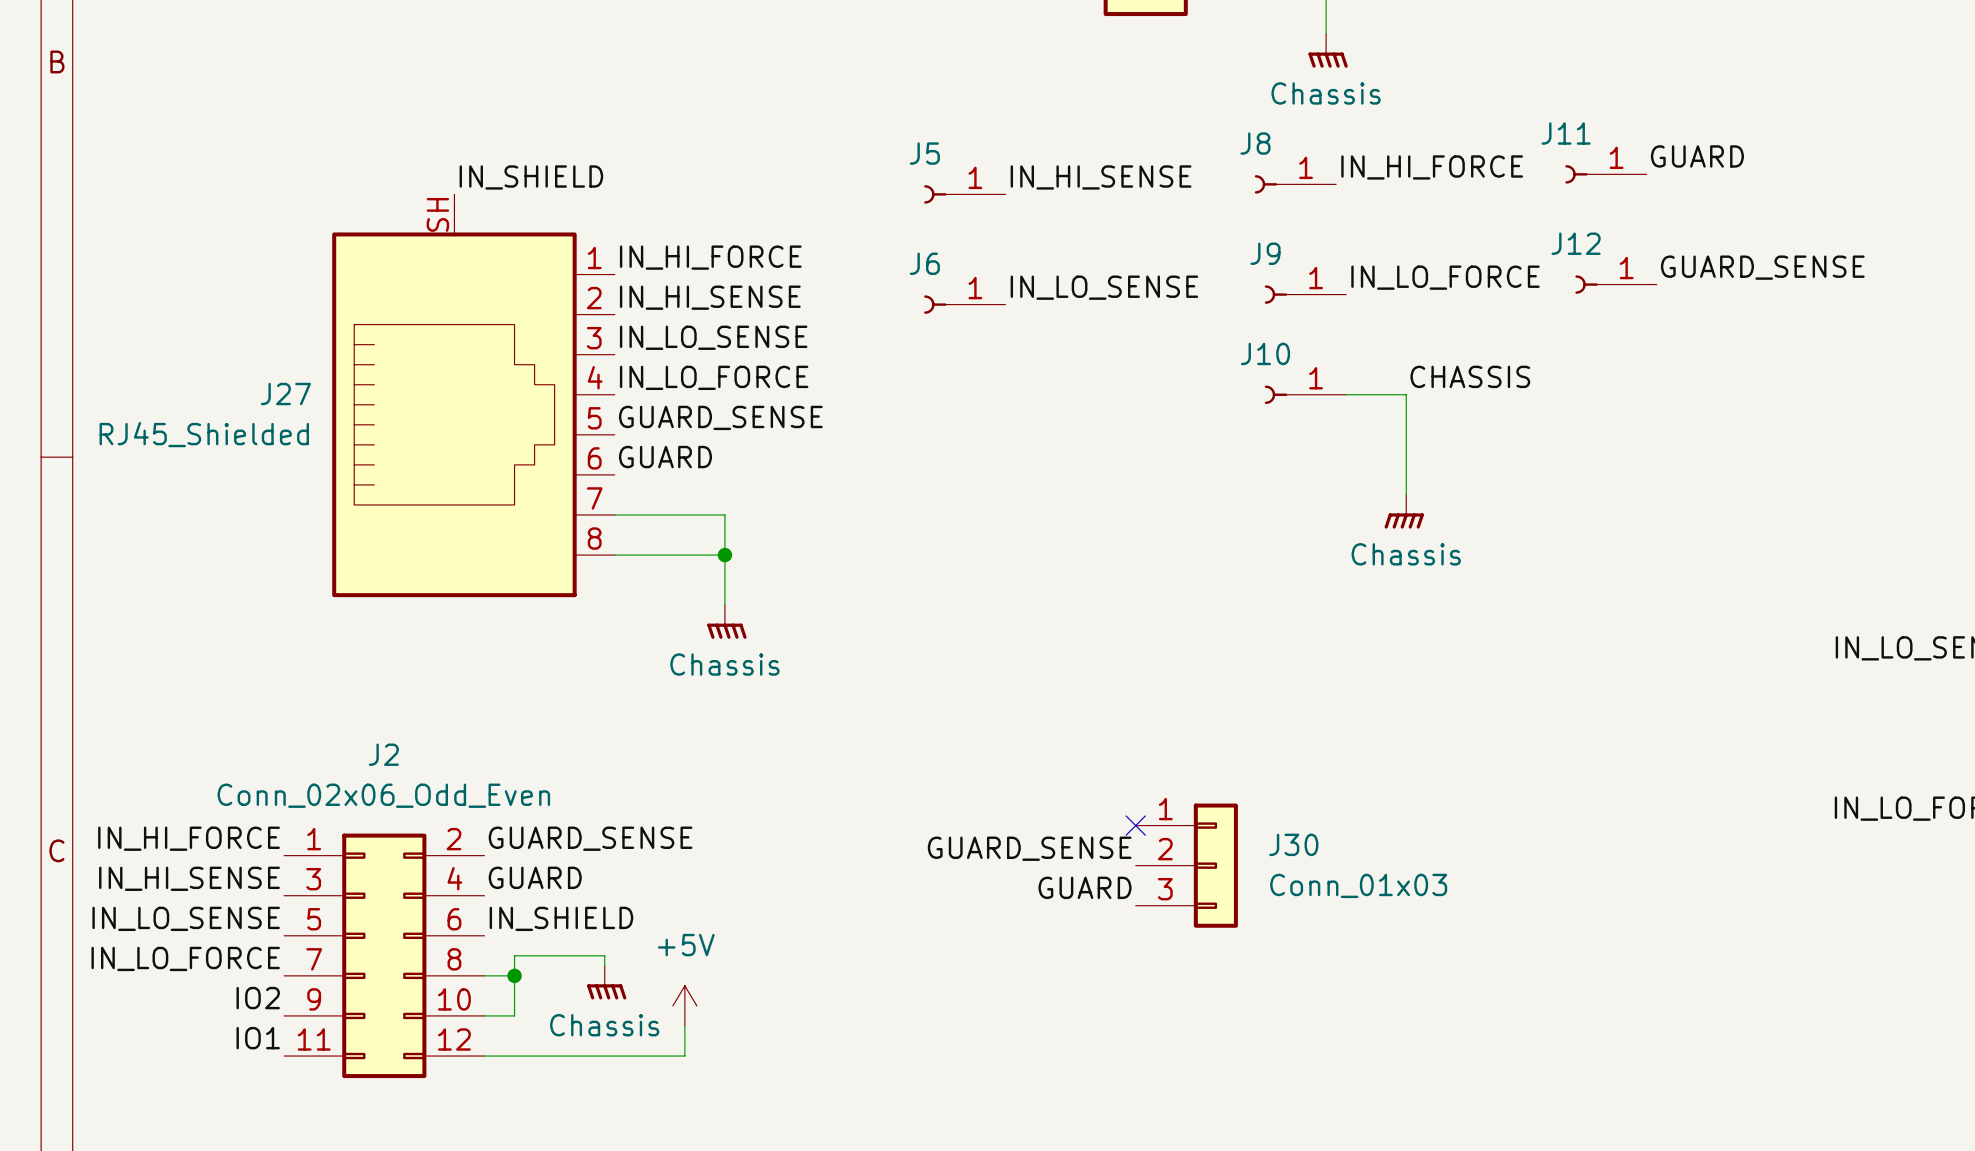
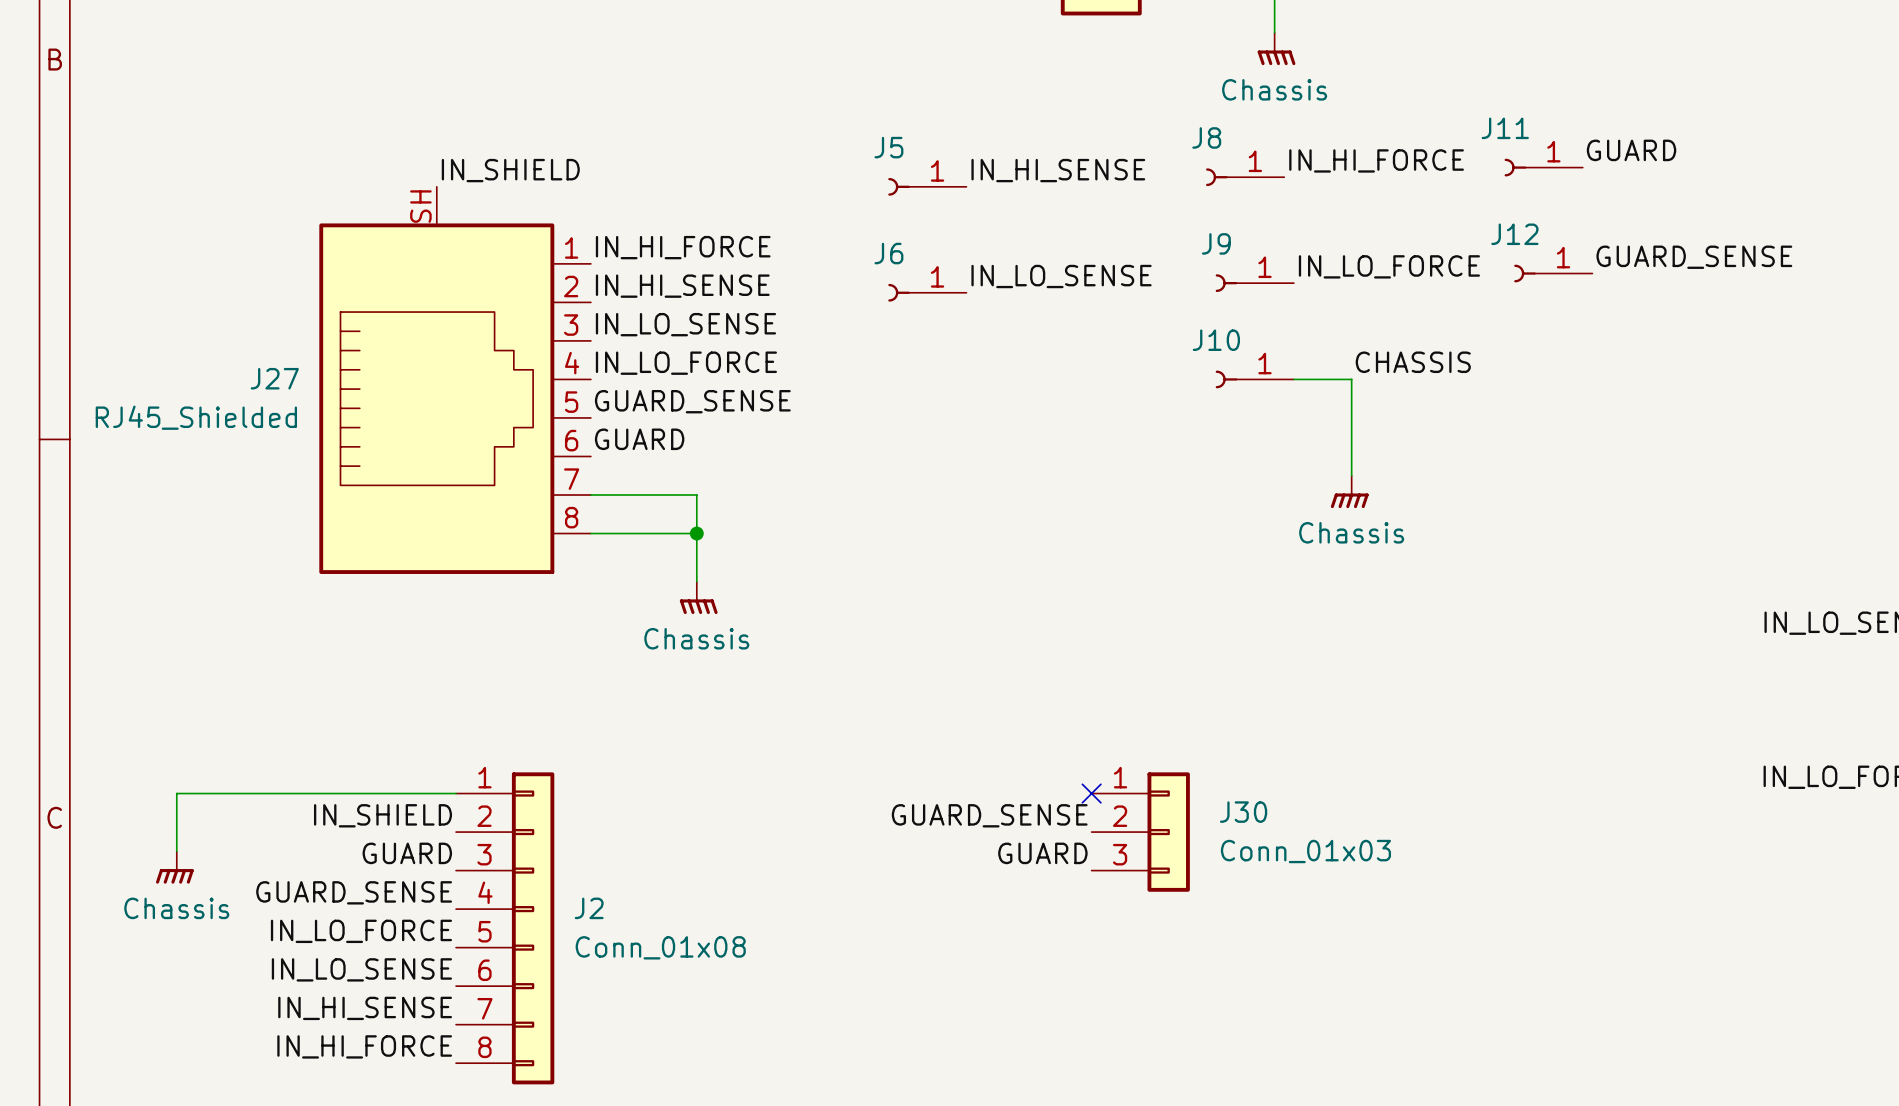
J2 name position: J2 (383, 754) -> J2 (589, 908)
J2 value: Conn_02x06_Odd_Even (383, 795) -> Conn_01x08 (660, 947)
wire: none -> (456, 793) (176, 793) (176, 851)
J2 symbol: [284, 833, 485, 1079] -> [456, 772, 555, 1085]
label position: IN_HI_FORCE (189, 838) -> IN_HI_FORCE (364, 1046)
label position: GUARD_SENSE (590, 838) -> GUARD_SENSE (354, 892)
label position: GUARD (535, 877) -> GUARD (407, 853)
label position: IN_HI_SENSE (189, 878) -> IN_HI_SENSE (365, 1008)
power symbol: none -> (174, 867)
label position: IN_LO_SENSE (186, 918) -> IN_LO_SENSE (361, 969)
label position: IN_SHIELD (561, 918) -> IN_SHIELD (383, 815)
label position: IN_LO_FORCE (185, 958) -> IN_LO_FORCE (361, 931)
wire: (604, 965) (604, 955) (514, 955) (514, 1015) (484, 1015) -> none
wire: (484, 975) (514, 975) -> none
junction: (514, 975) -> none
power symbol: (606, 982) -> none
label: IO2 (258, 998) -> none
power symbol: +5V (684, 1005) -> none
wire: (684, 1025) (684, 1056) (484, 1056) -> none
label: IO1 (258, 1038) -> none

